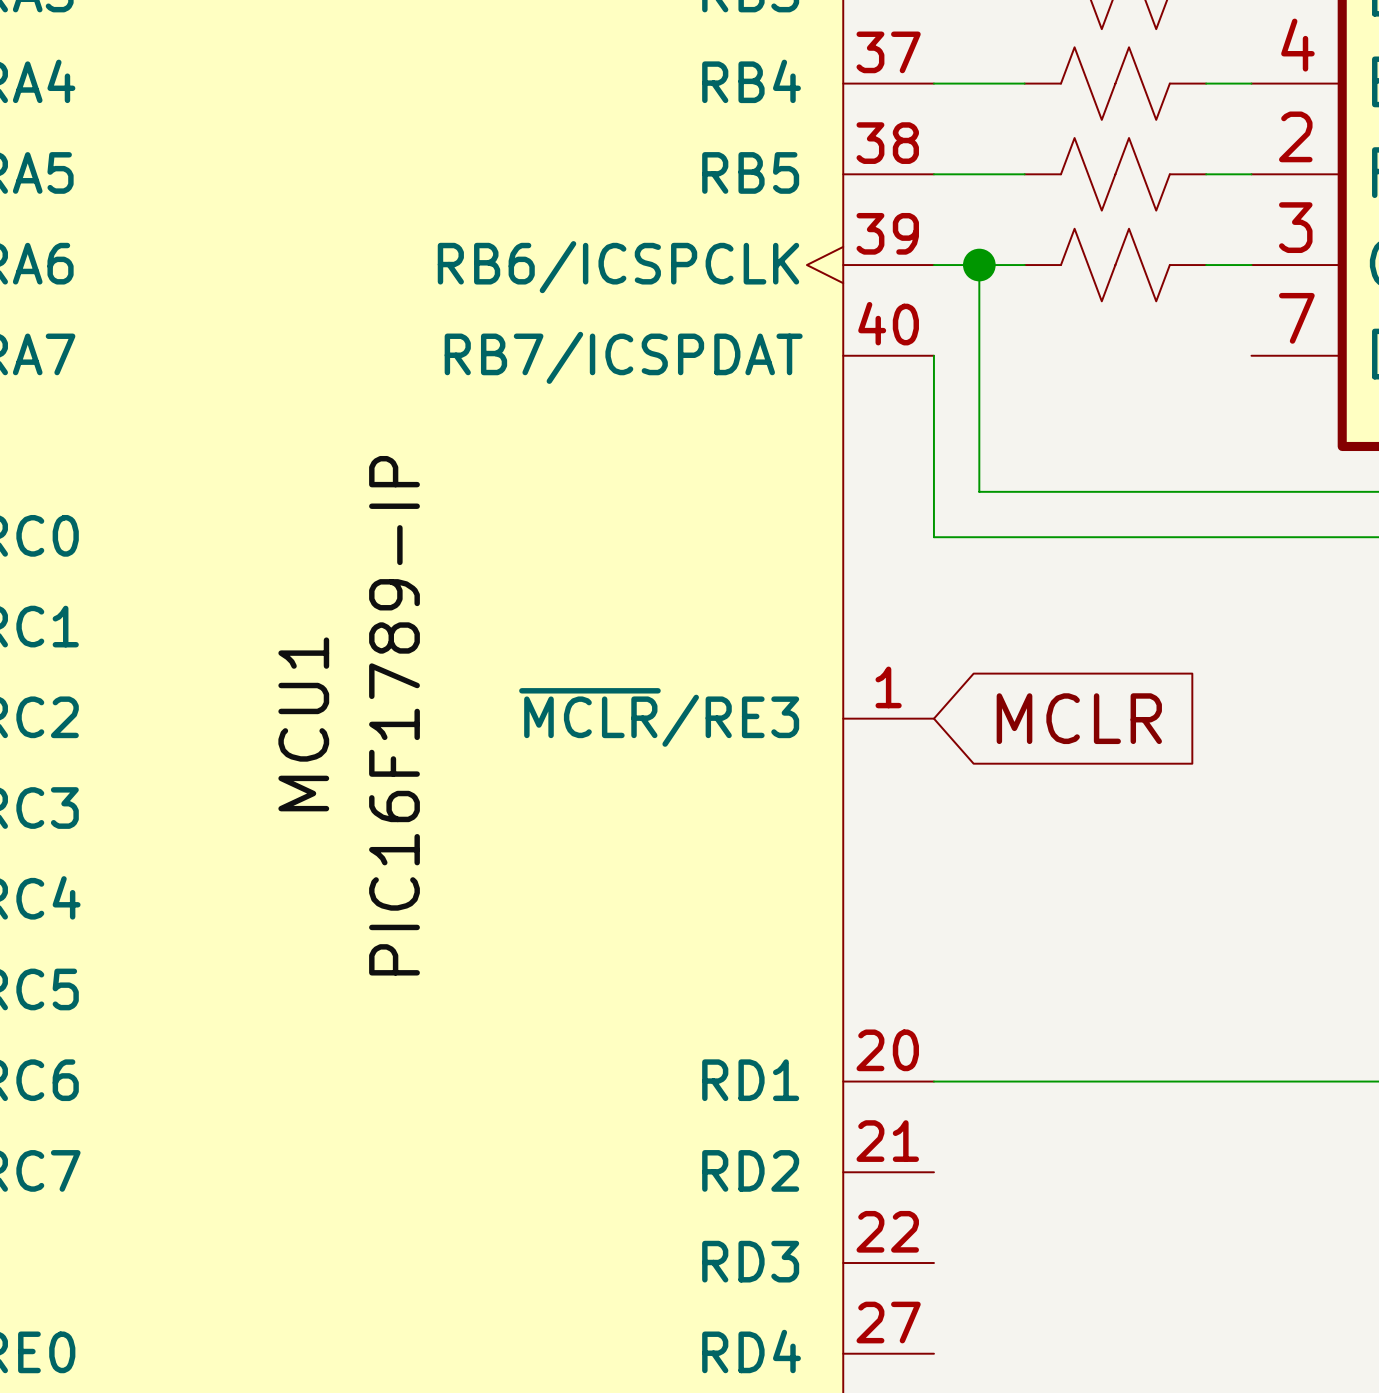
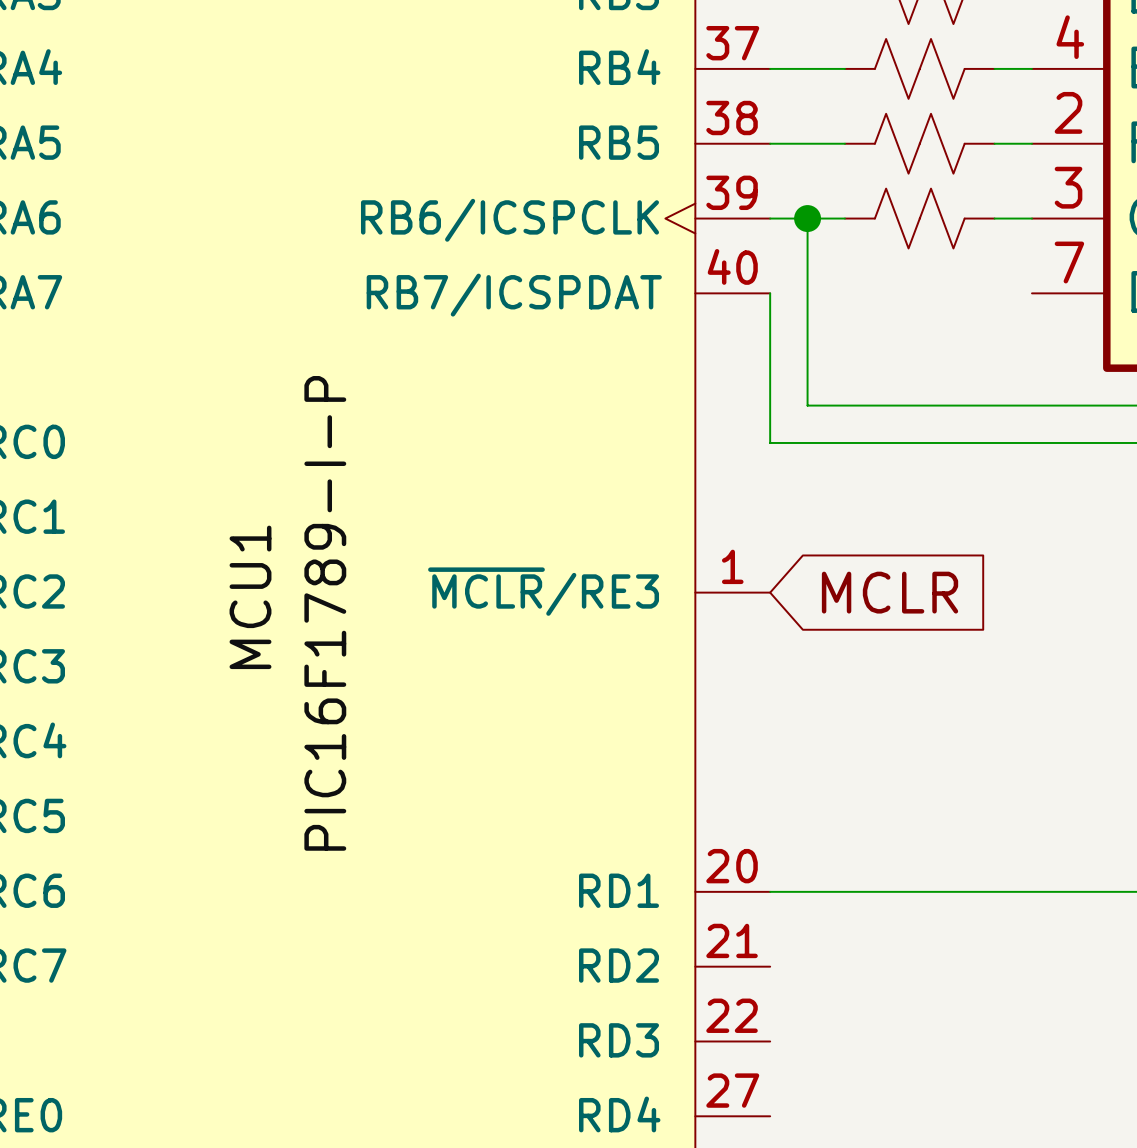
label: PIC16F1789-IP (394, 715) -> PIC16F1789-I-P (325, 613)

